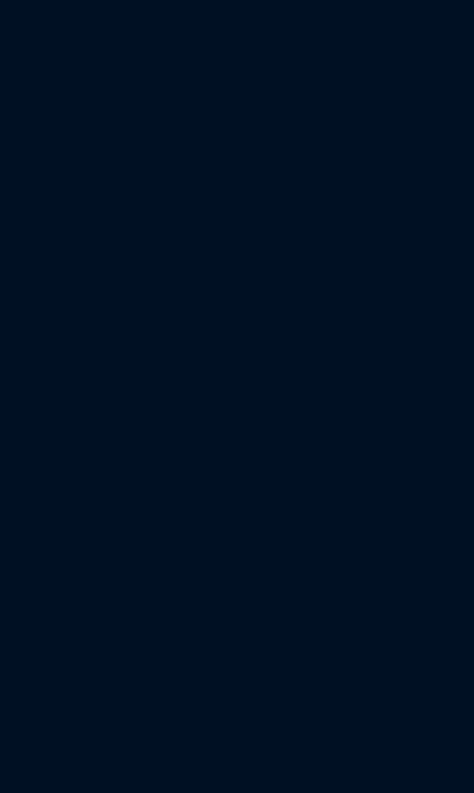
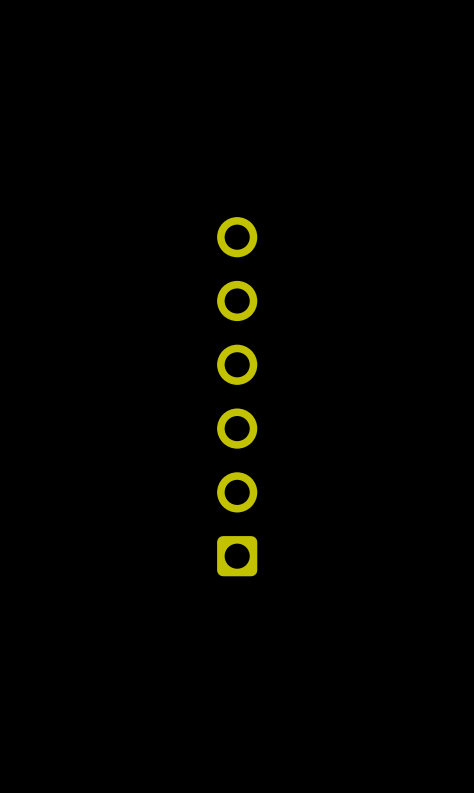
part: none -> (237, 396)

